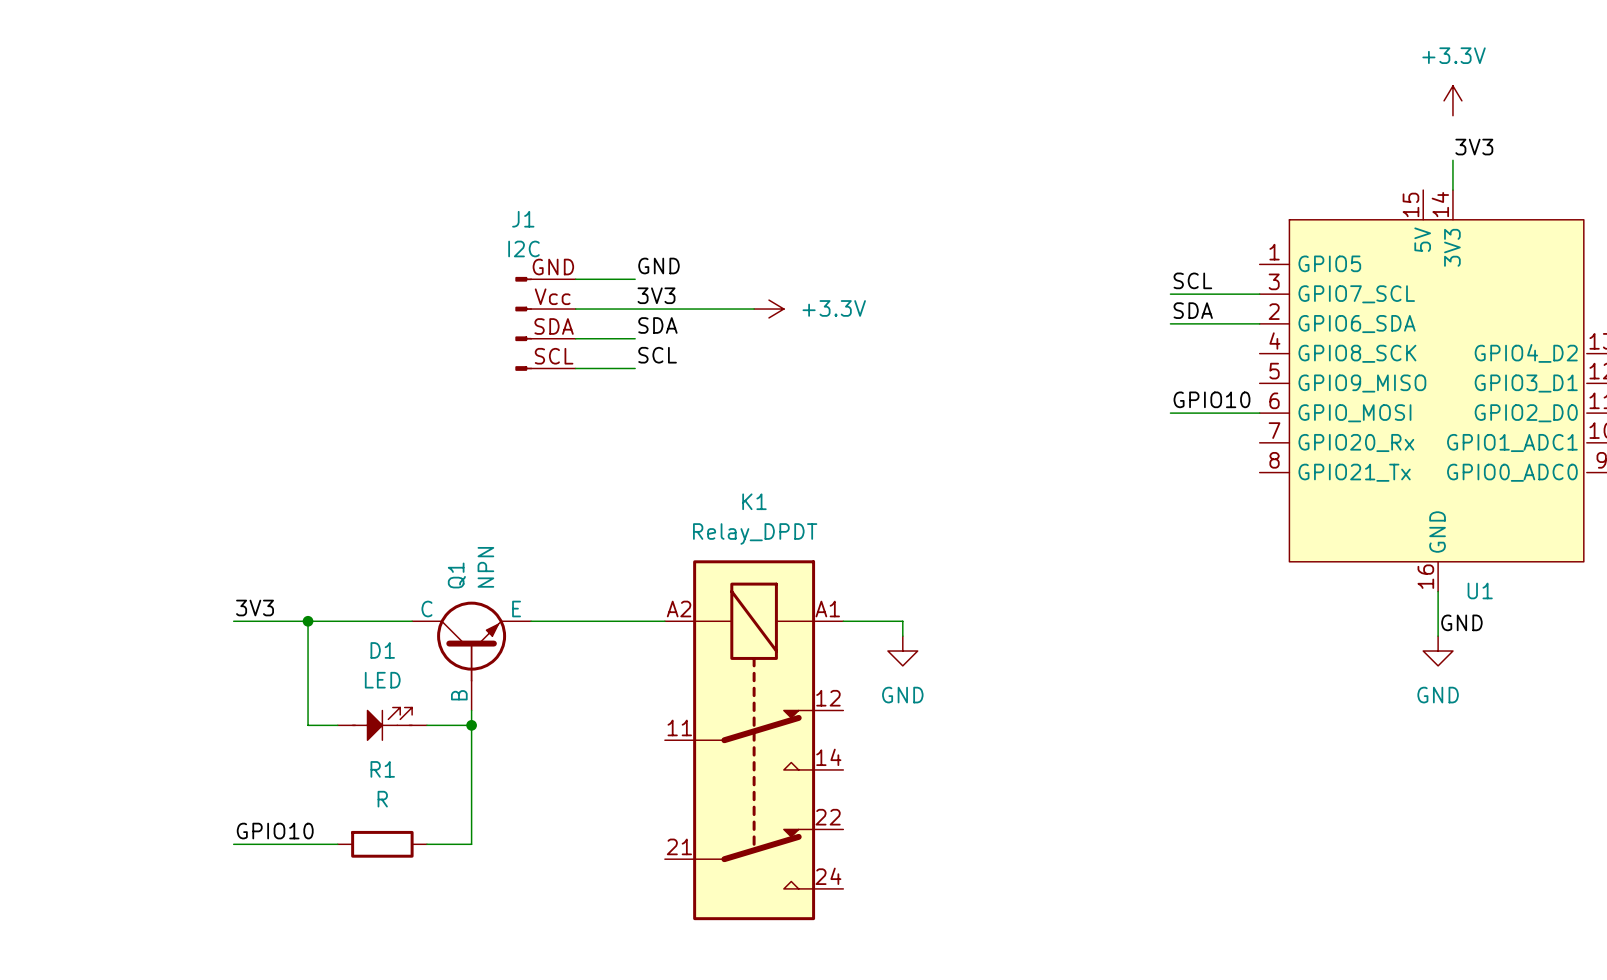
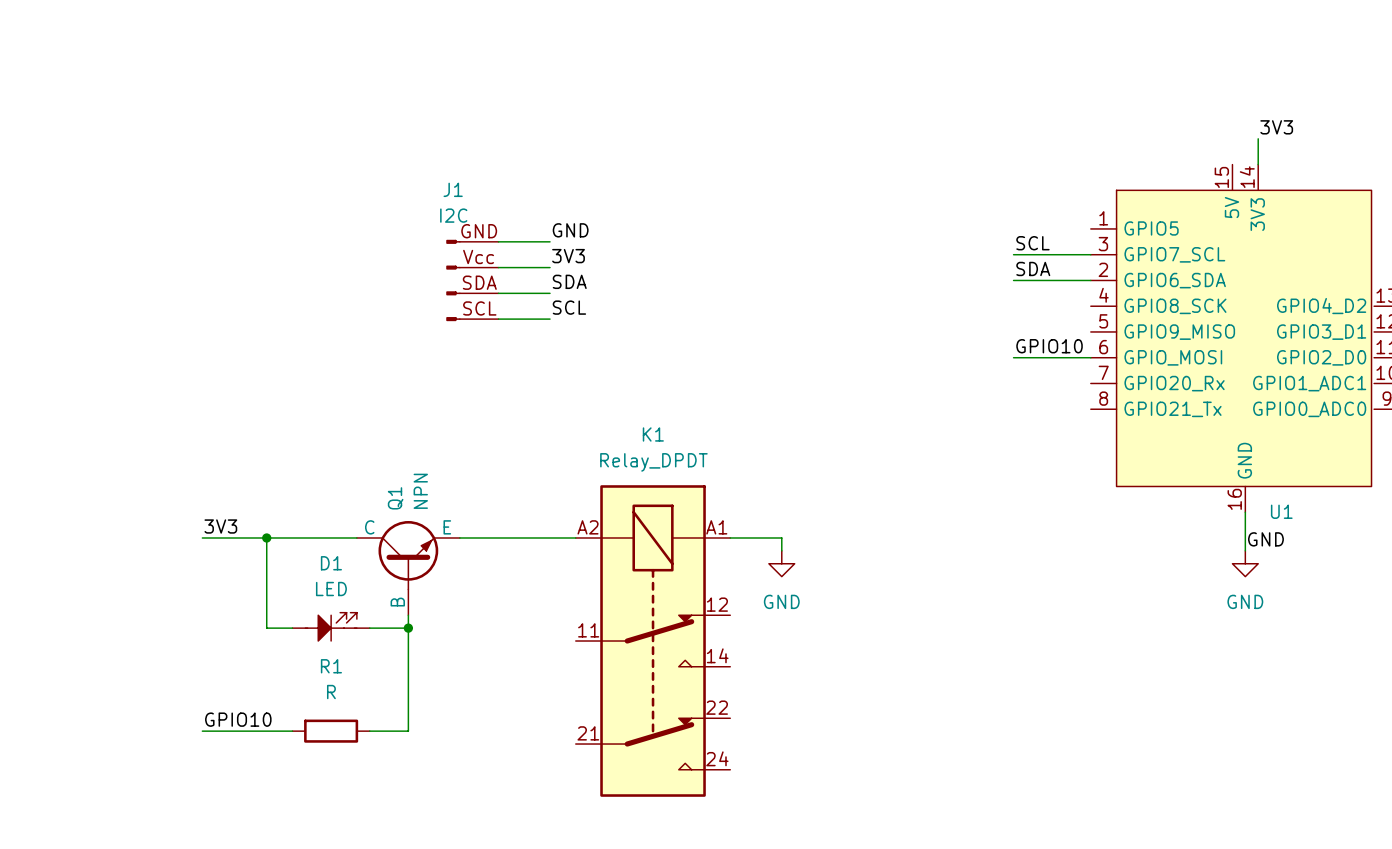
power symbol: +3.3V (1452, 100) -> none
wire: (635, 309) (754, 309) -> none
power symbol: +3.3V (768, 309) -> none

